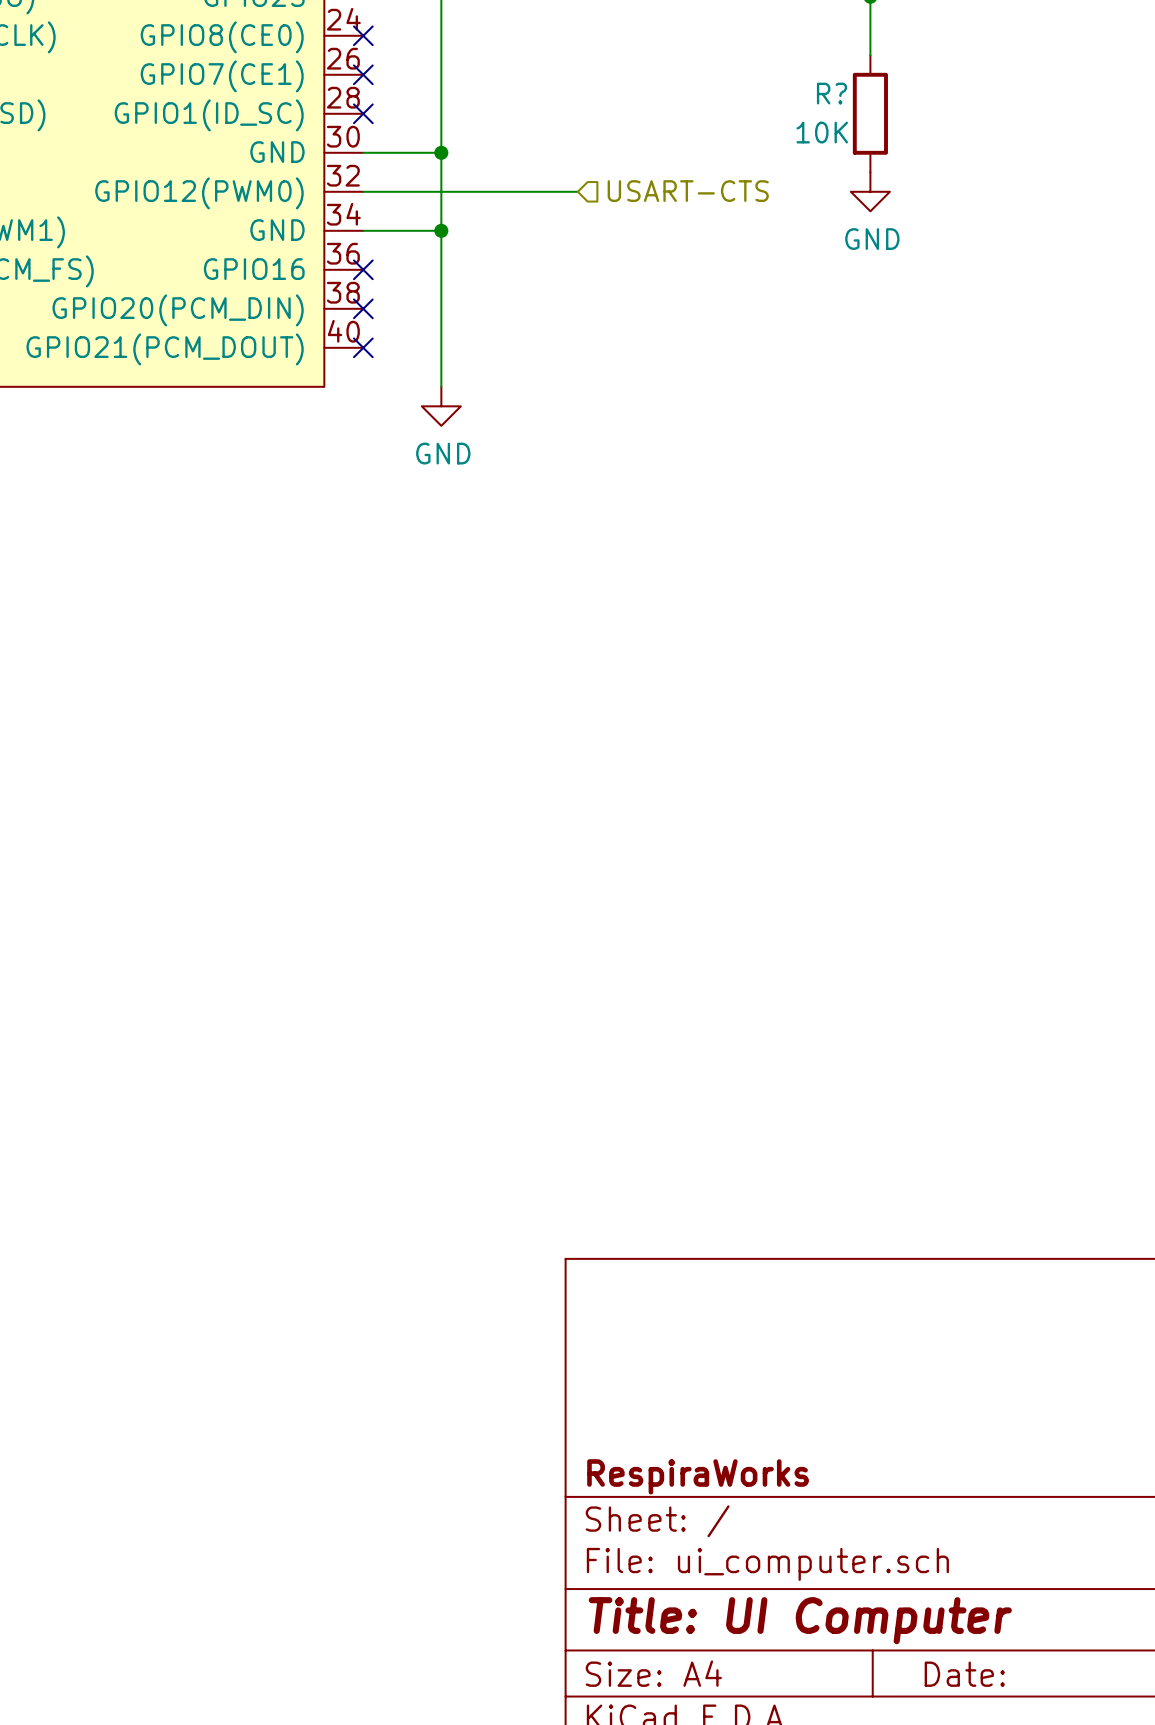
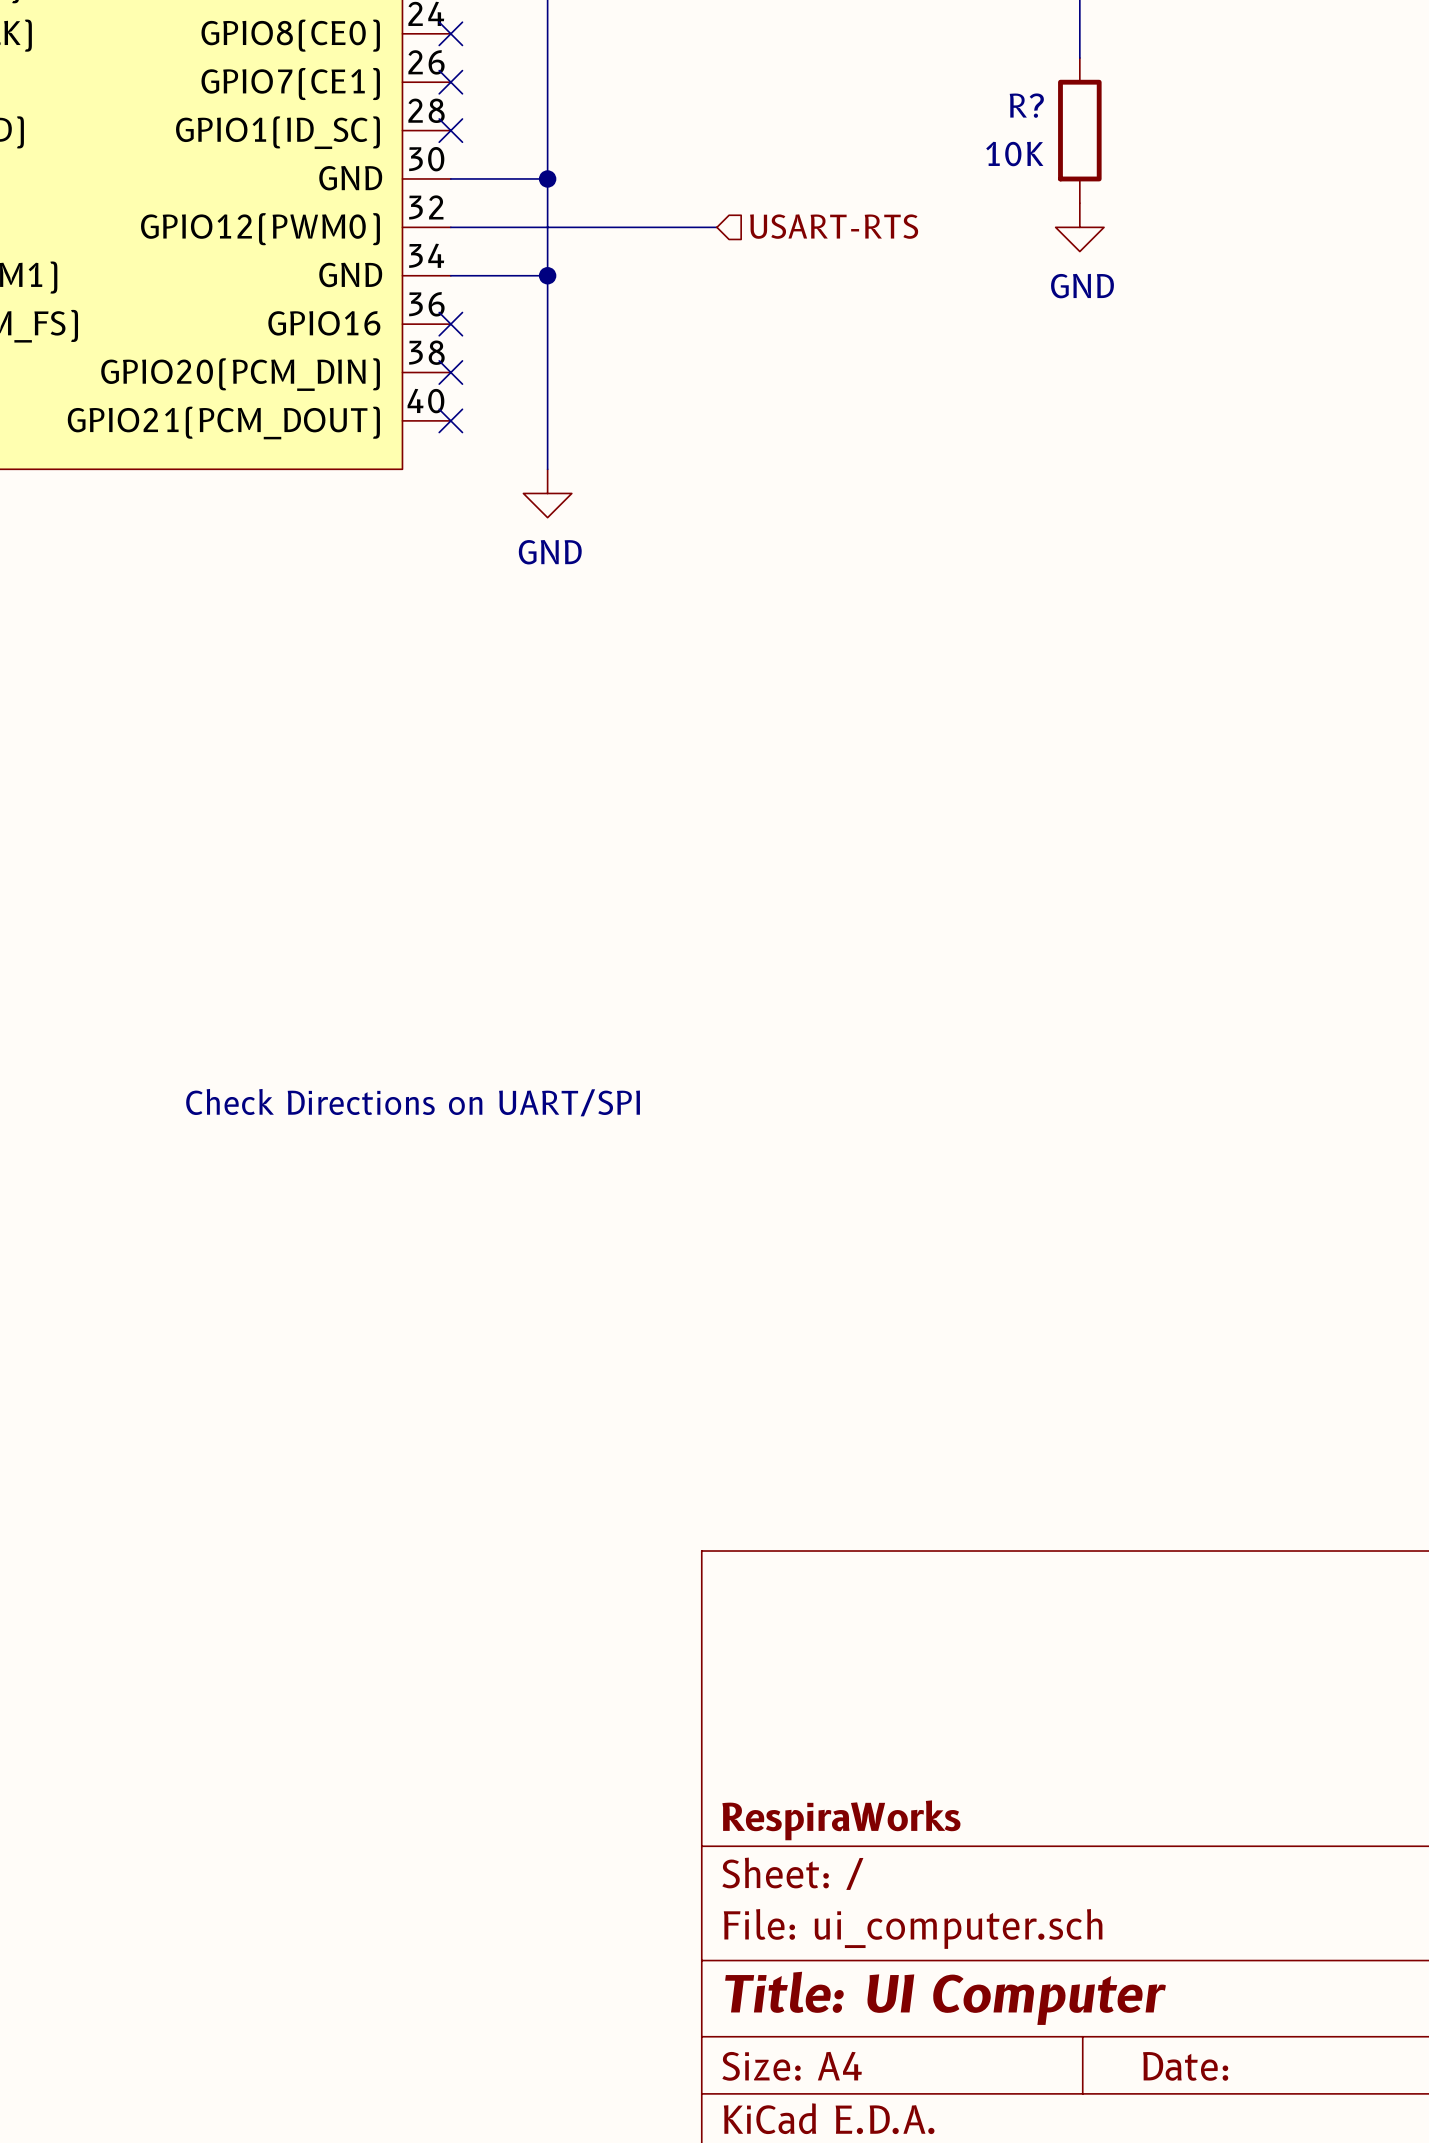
hierarchical label: USART-CTS (688, 191) -> USART-RTS (834, 226)
text: none -> Check Directions on UART/SPI (413, 1102)

